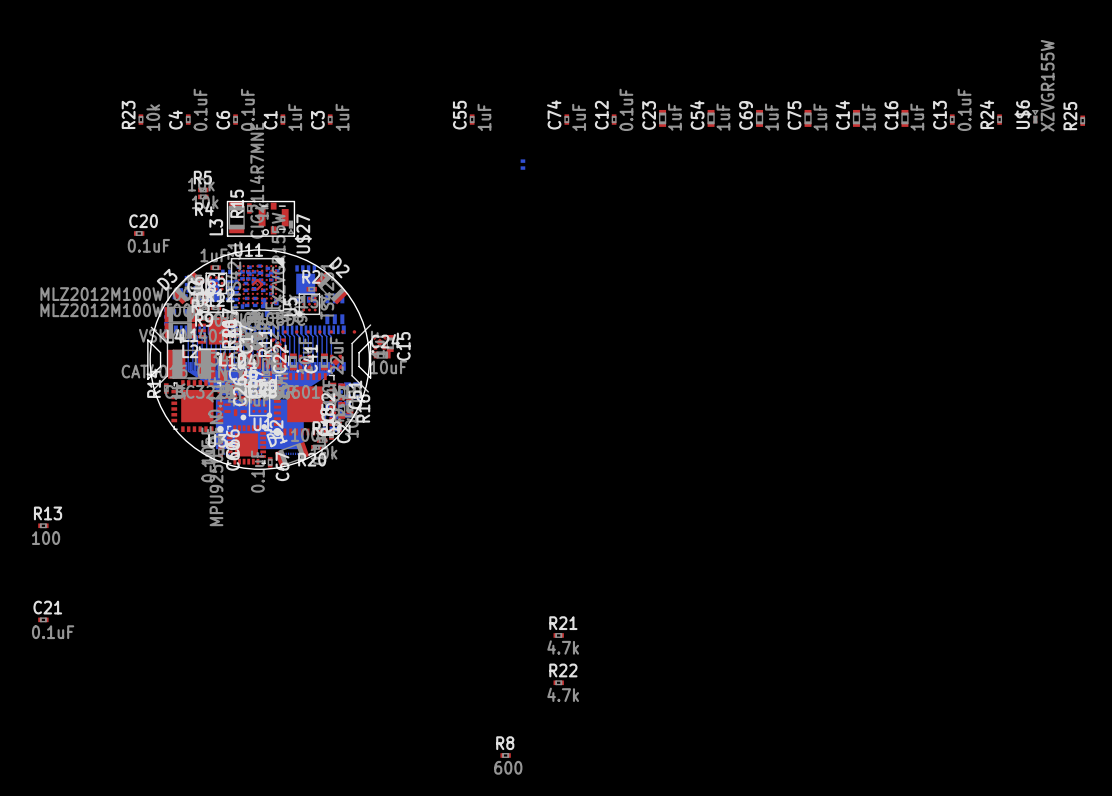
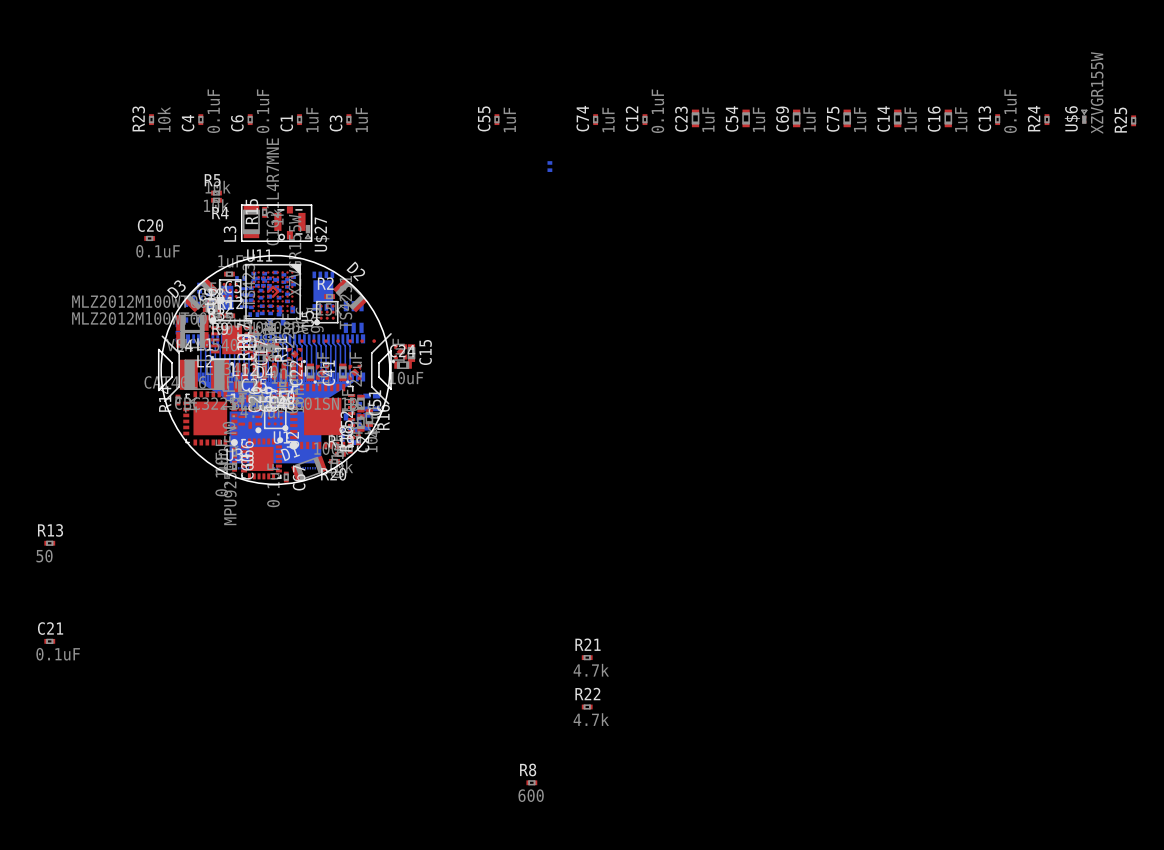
R13 value: 100 (46, 538) -> 50 (44, 556)

